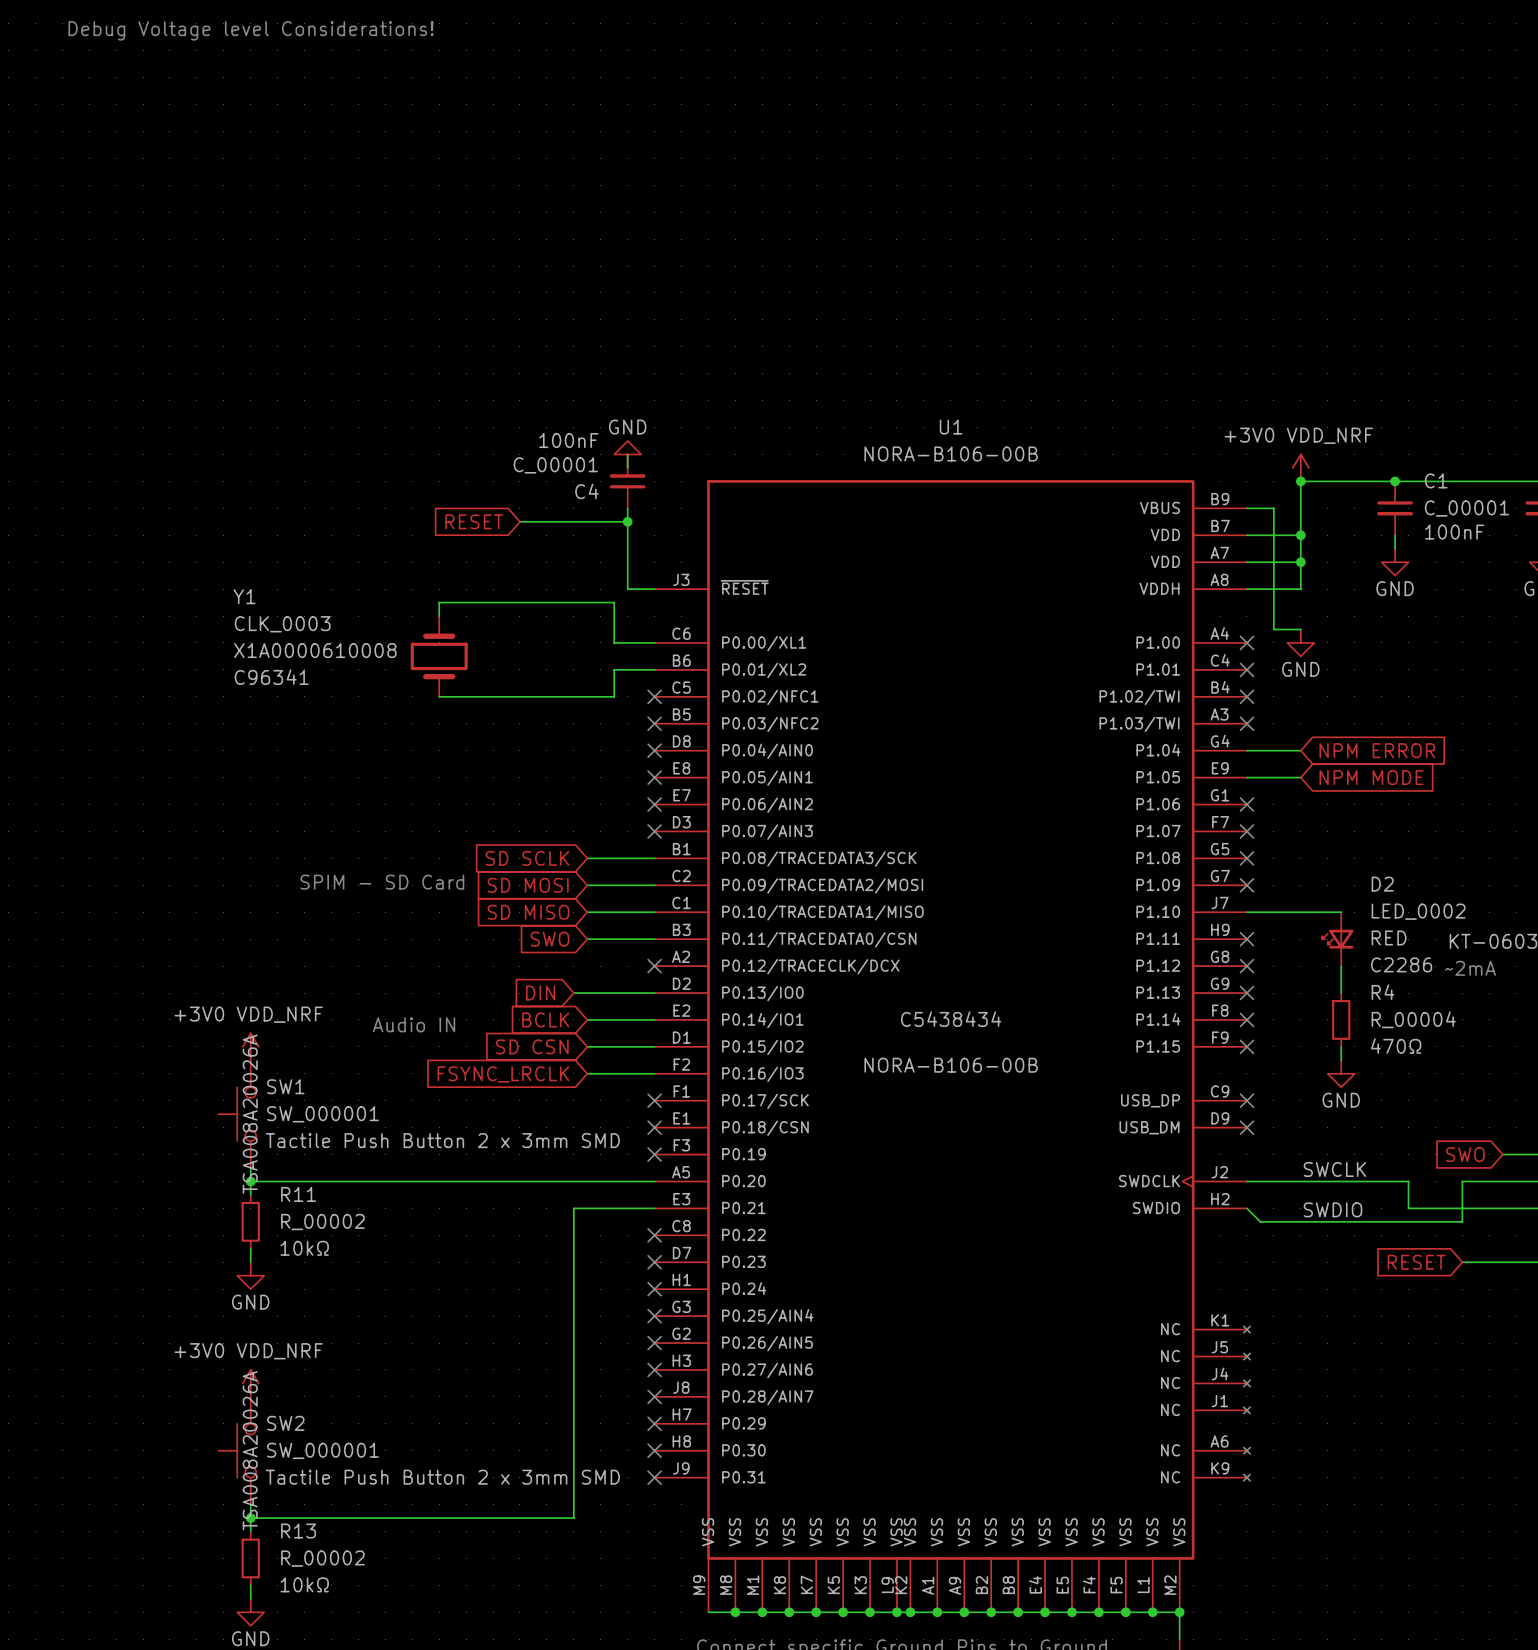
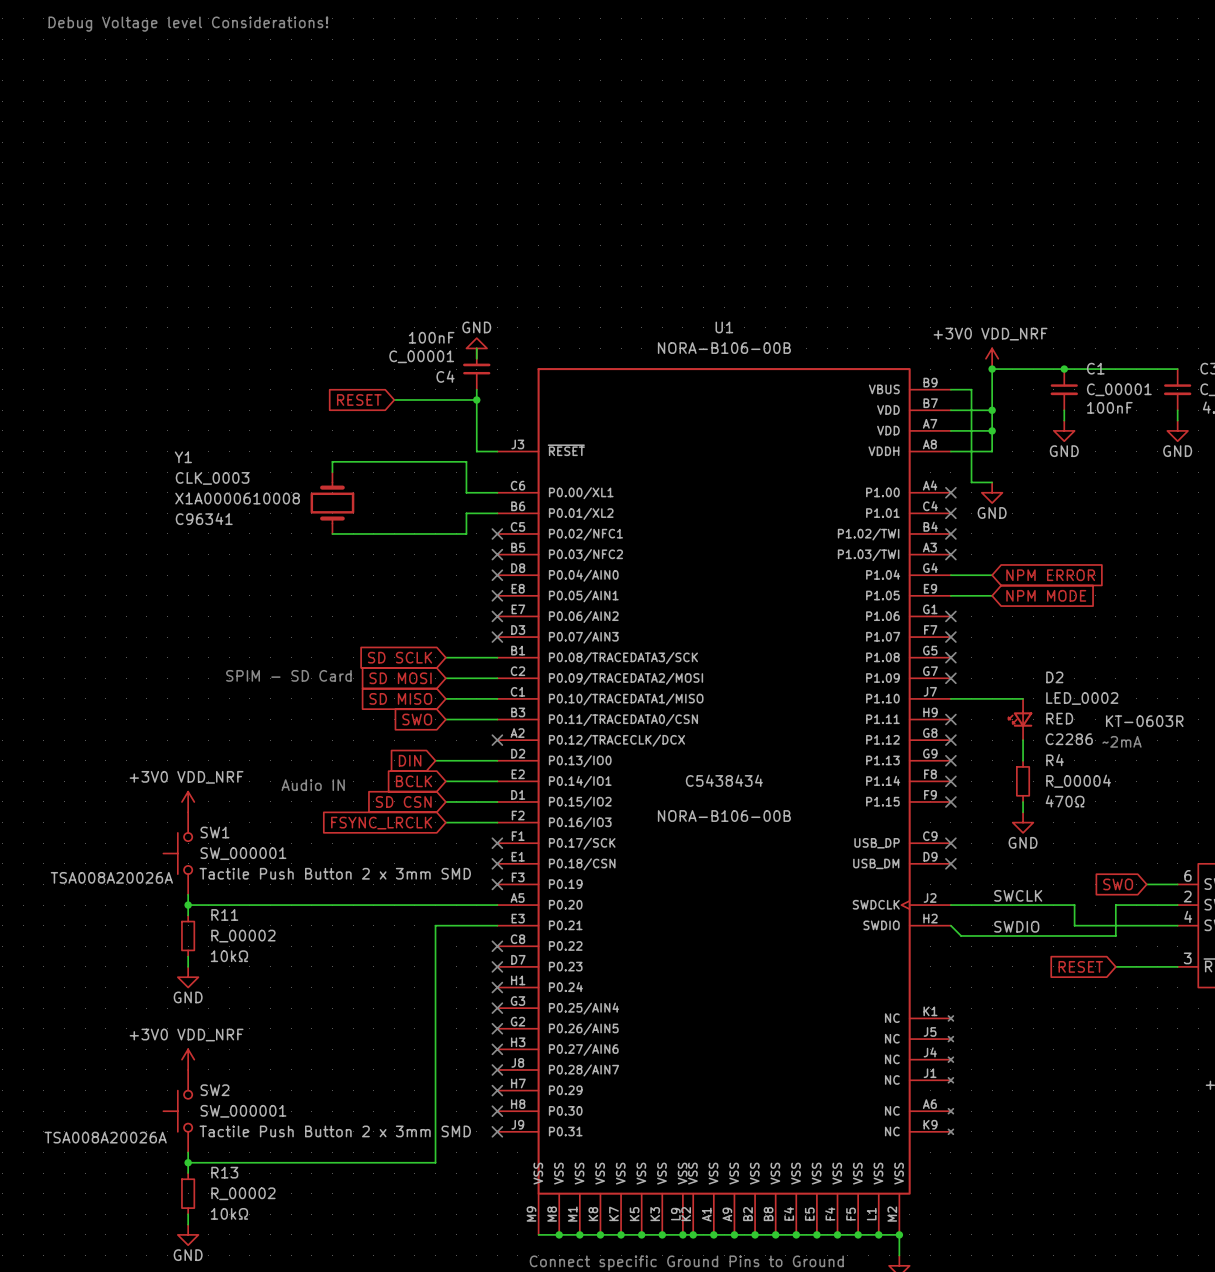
SW1 text rotation: 0° (250, 1114) -> 90° clockwise (111, 877)
SW2 text rotation: 0° (250, 1450) -> 90° clockwise (105, 1137)

